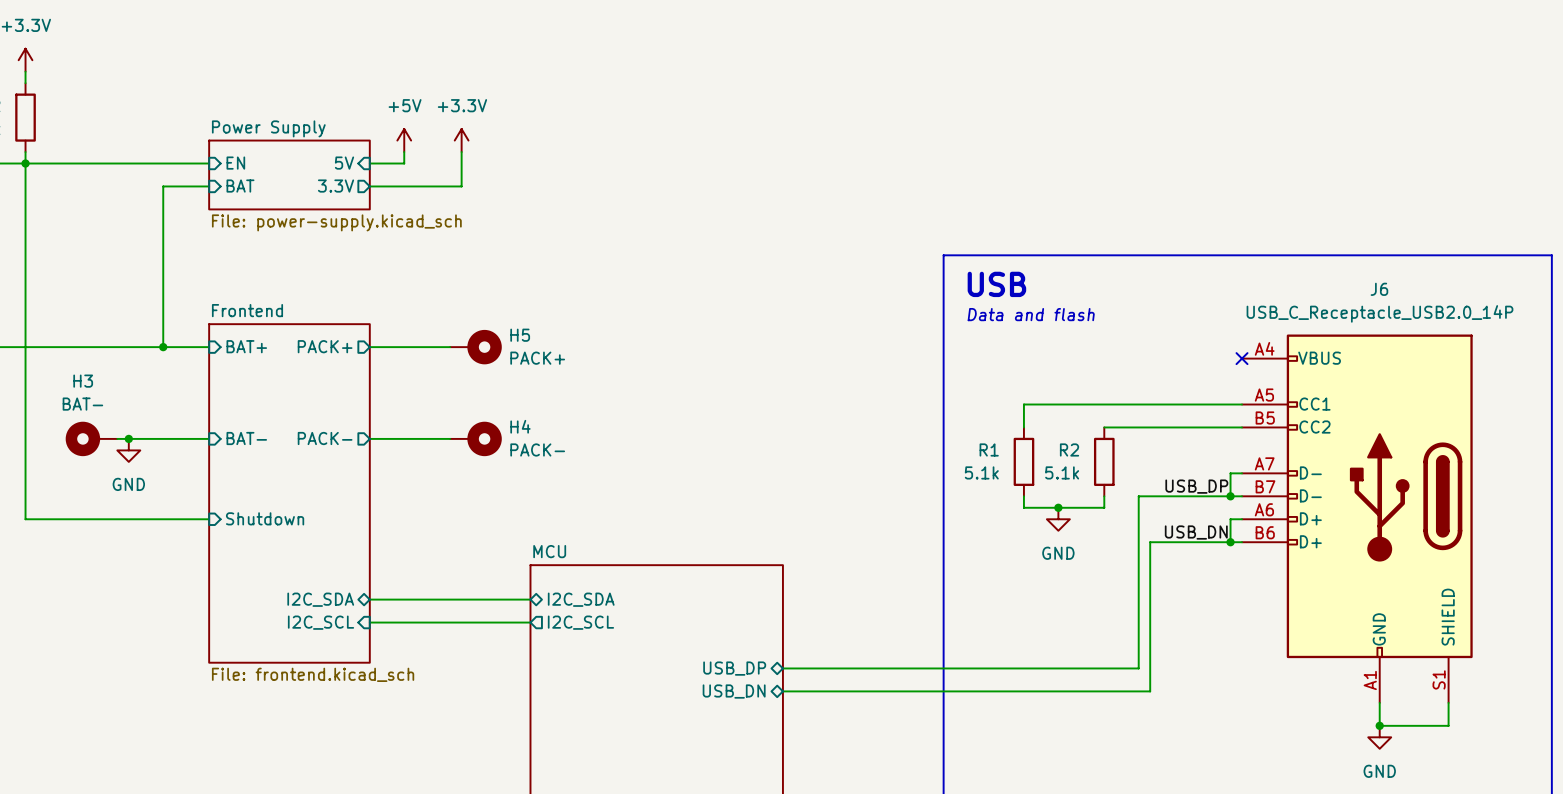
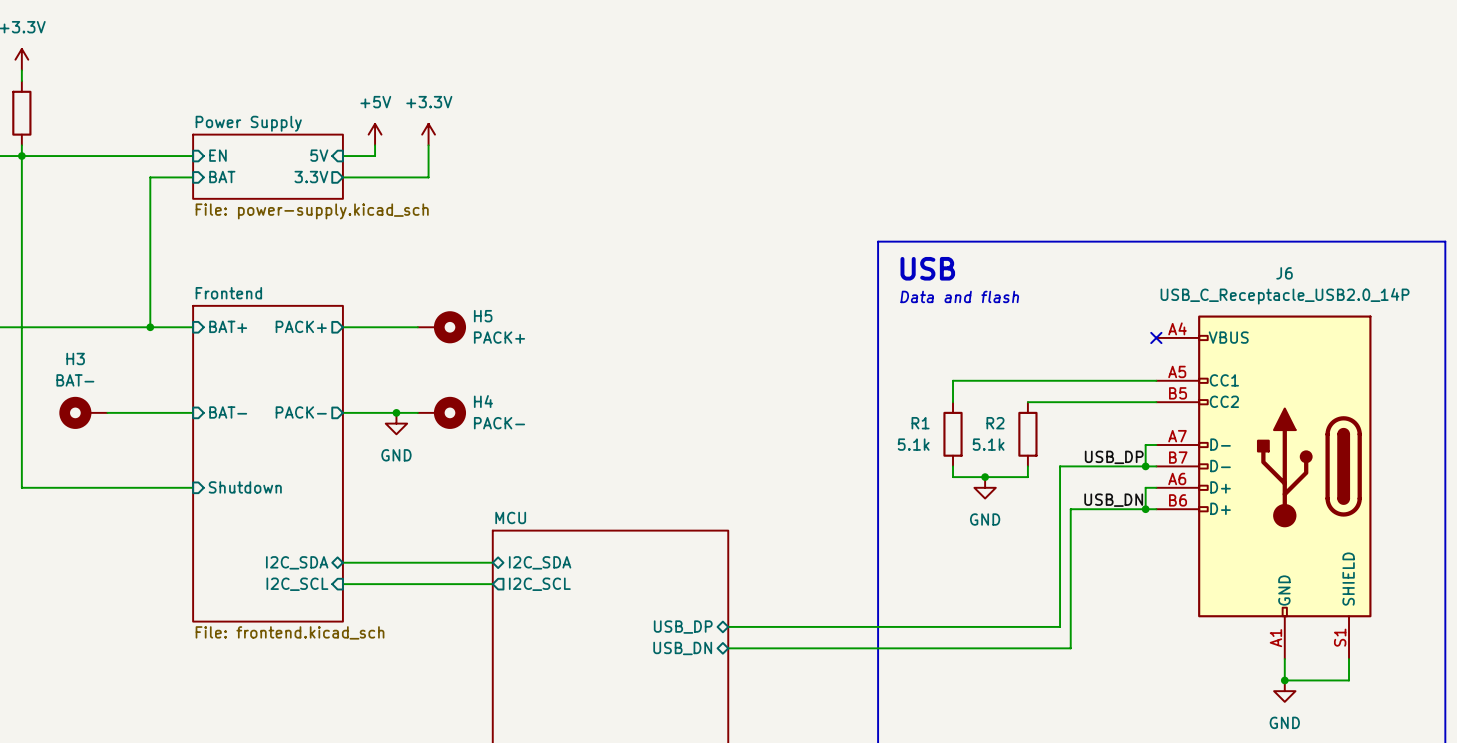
junction: (128, 438) -> none
junction: none -> (396, 412)
power symbol: GND (128, 450) -> none
power symbol: none -> GND (396, 423)

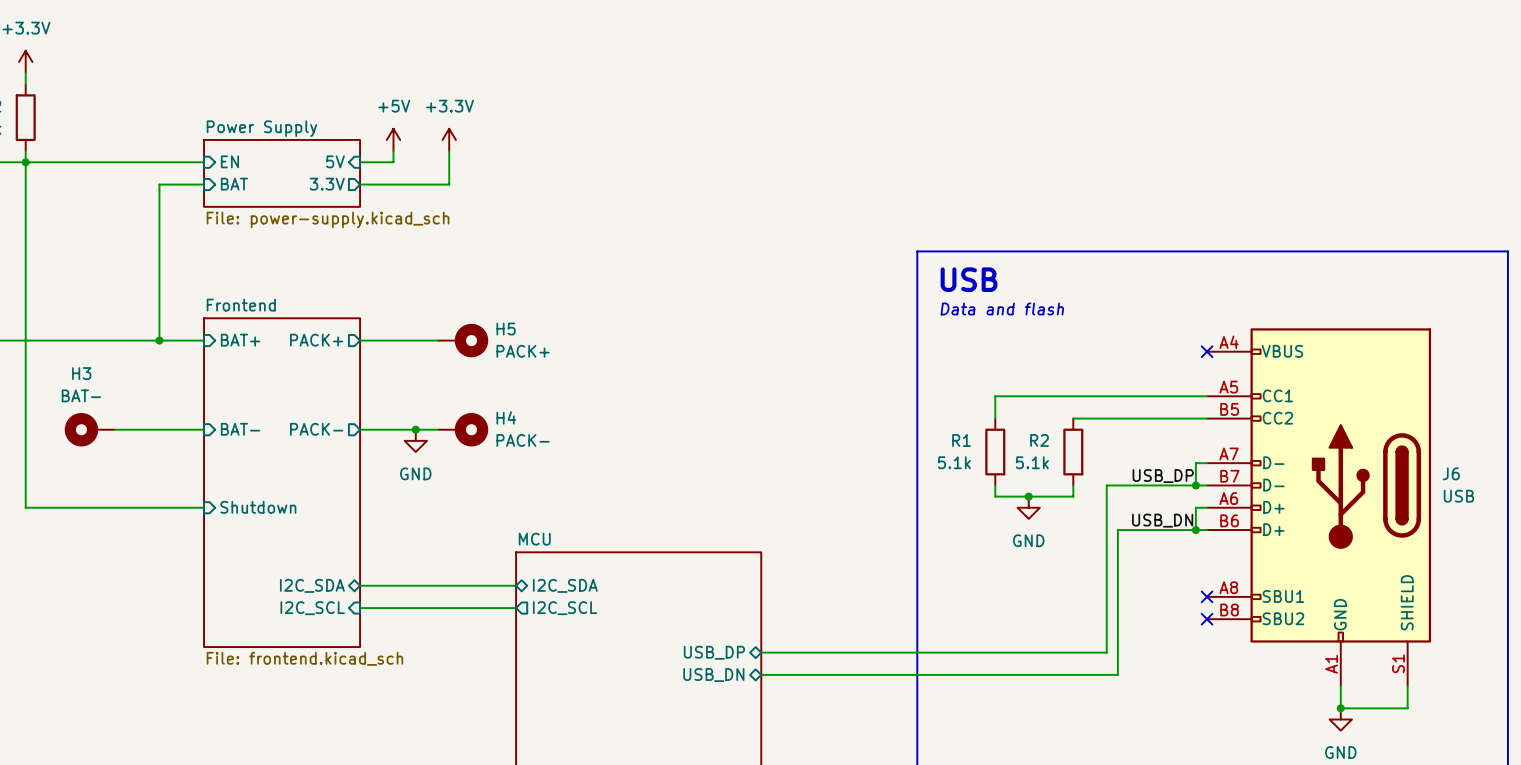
J6 name position: J6 (1284, 273) -> J6 (1451, 473)
J6 value: USB_C_Receptacle_USB2.0_14P (1285, 296) -> USB (1458, 496)
J6 symbol: [1156, 315, 1372, 660] -> [1207, 328, 1432, 687]
no-connect mark: none -> (1207, 596)
no-connect mark: none -> (1207, 619)

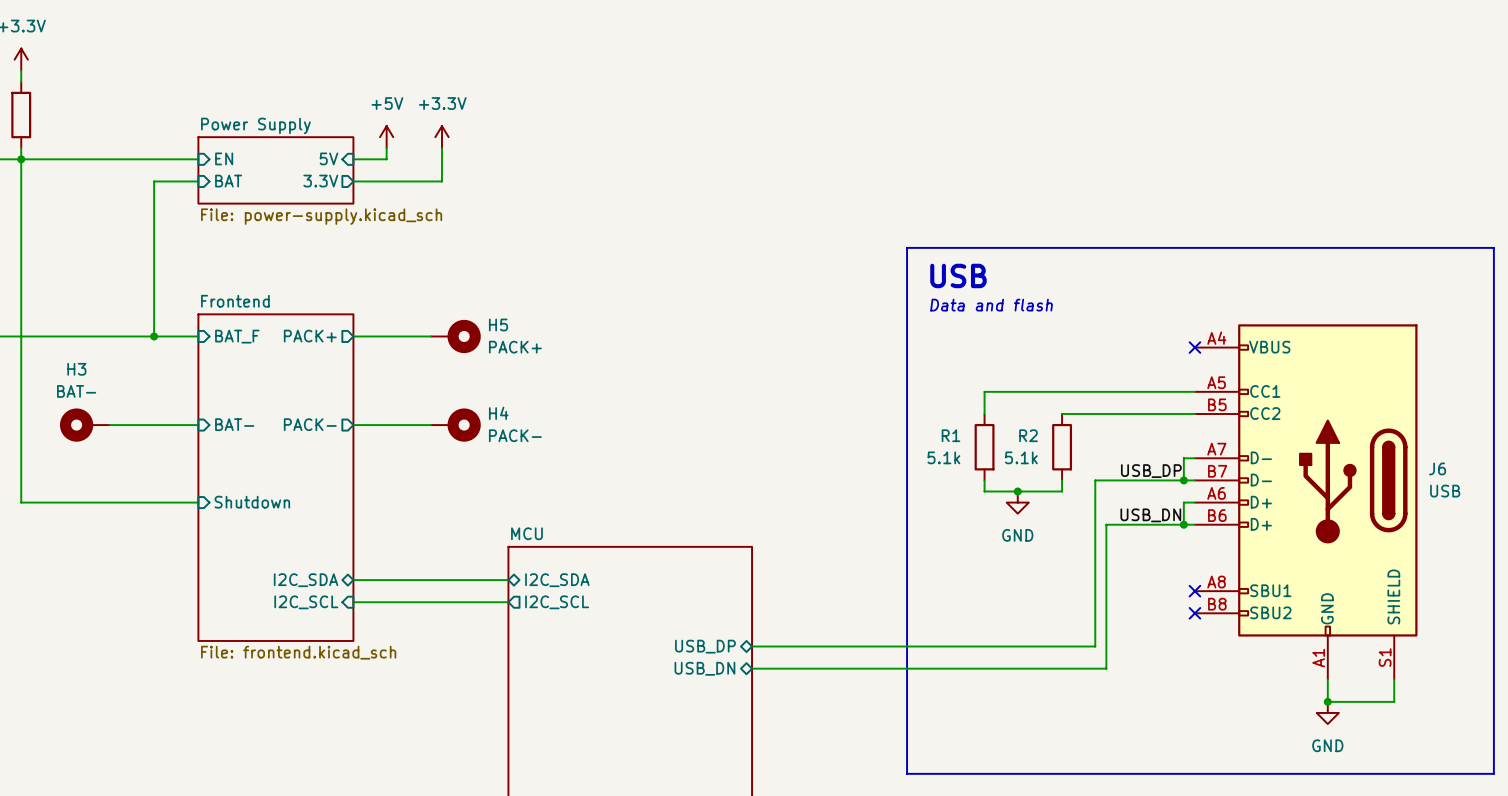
sheet pin: BAT+ (240, 340) -> BAT_F (237, 336)
junction: (415, 429) -> none
power symbol: GND (415, 440) -> none

